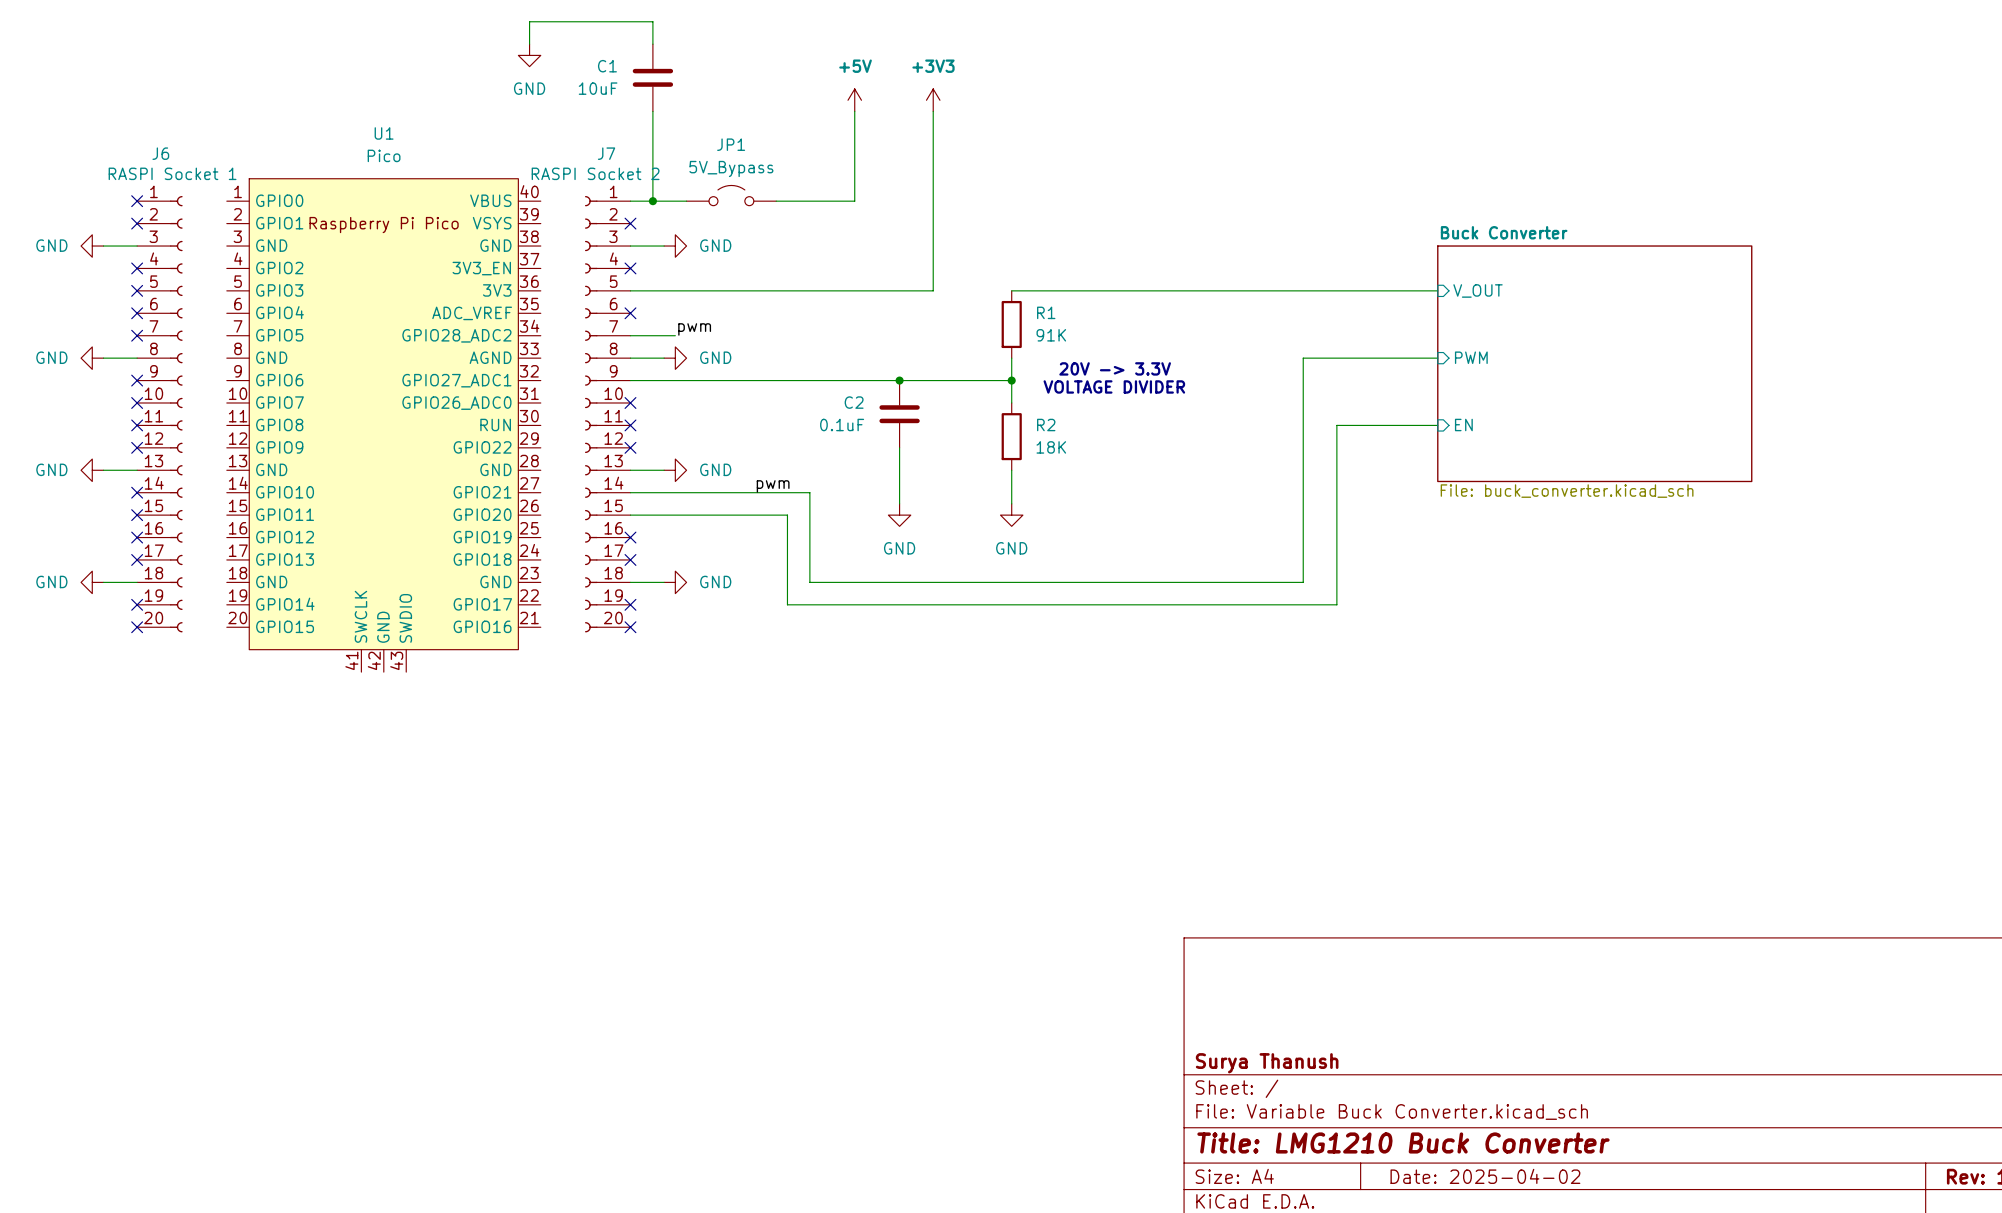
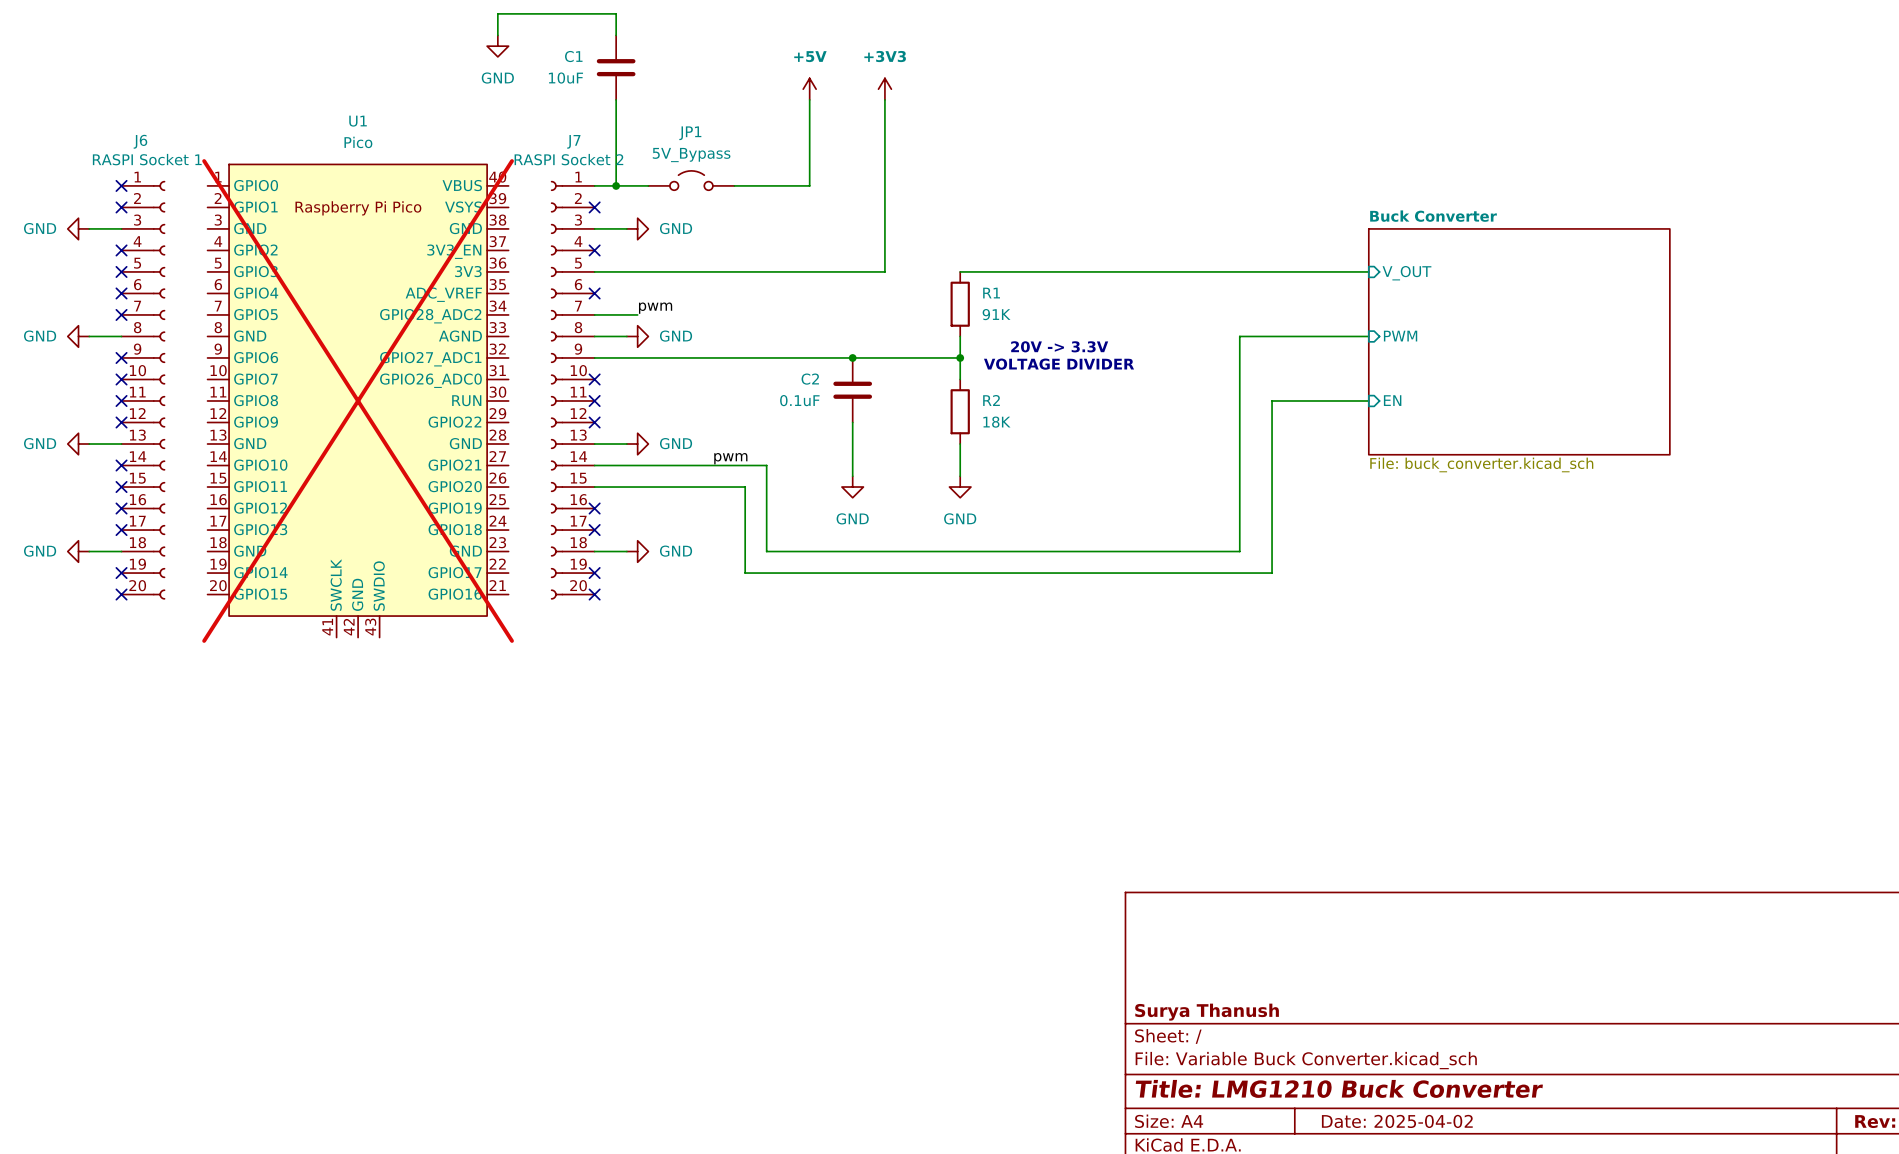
U1 do-not-place cross: none -> (358, 400)

